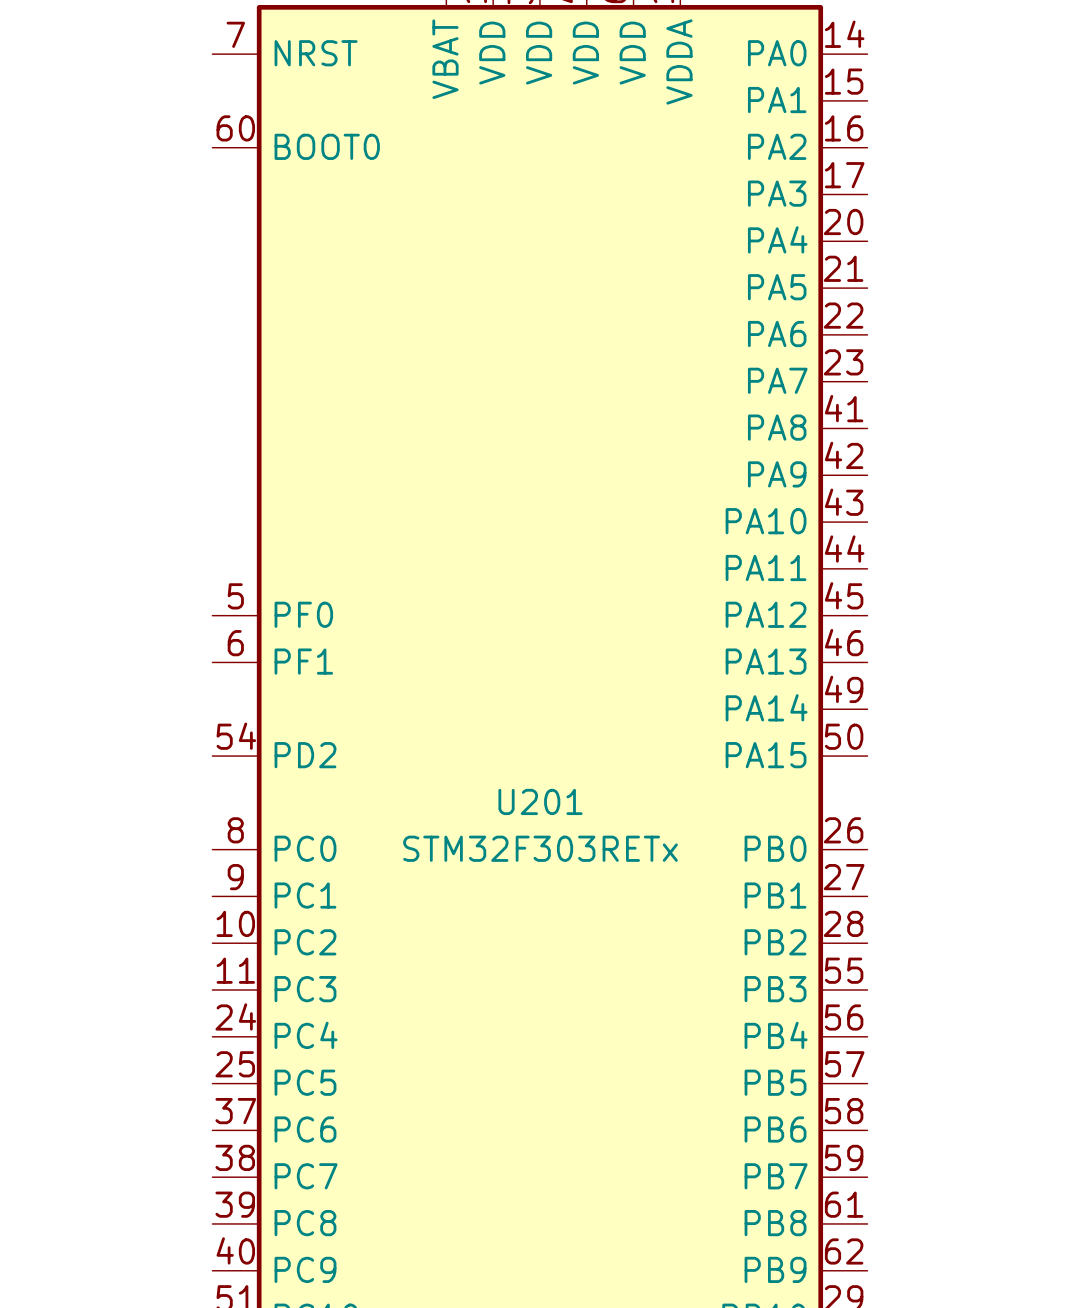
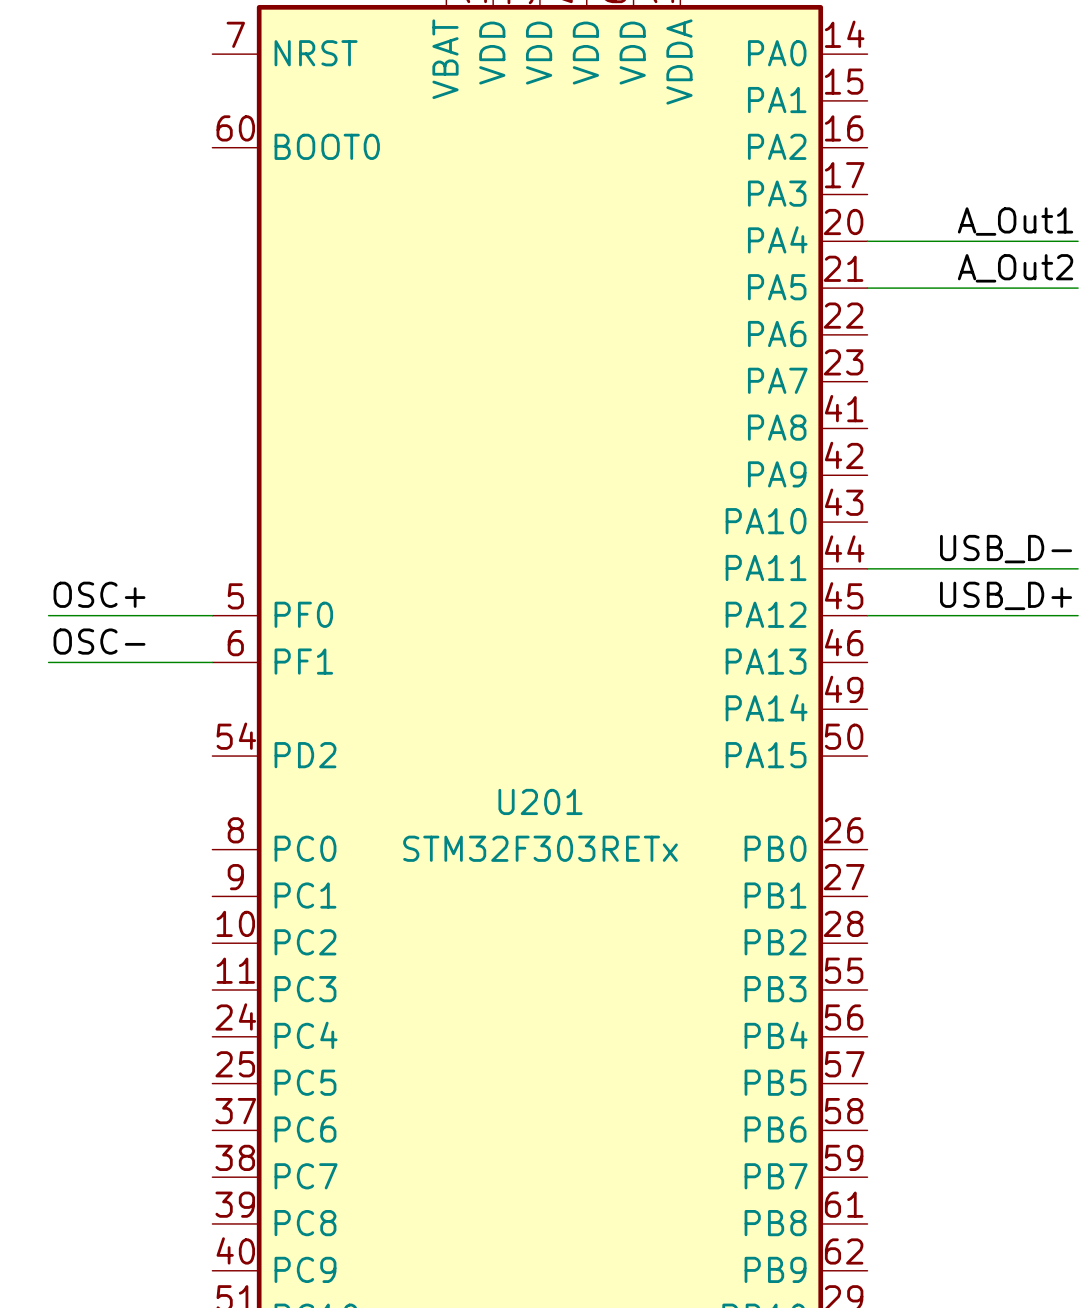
label: none -> A_Out1 (1015, 221)
wire: none -> (867, 241) (1078, 241)
label: none -> A_Out2 (1015, 268)
wire: none -> (867, 288) (1078, 288)
label: none -> USB_D- (1006, 549)
wire: none -> (867, 568) (1078, 568)
label: none -> OSC+ (99, 594)
label: none -> USB_D+ (1006, 595)
wire: none -> (48, 615) (212, 615)
wire: none -> (867, 615) (1078, 615)
label: none -> OSC- (99, 641)
wire: none -> (48, 662) (212, 662)

